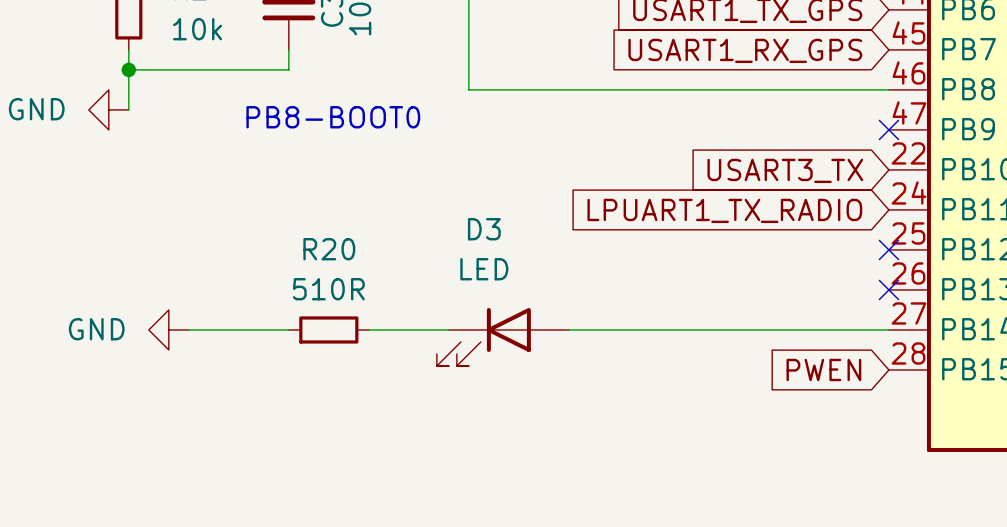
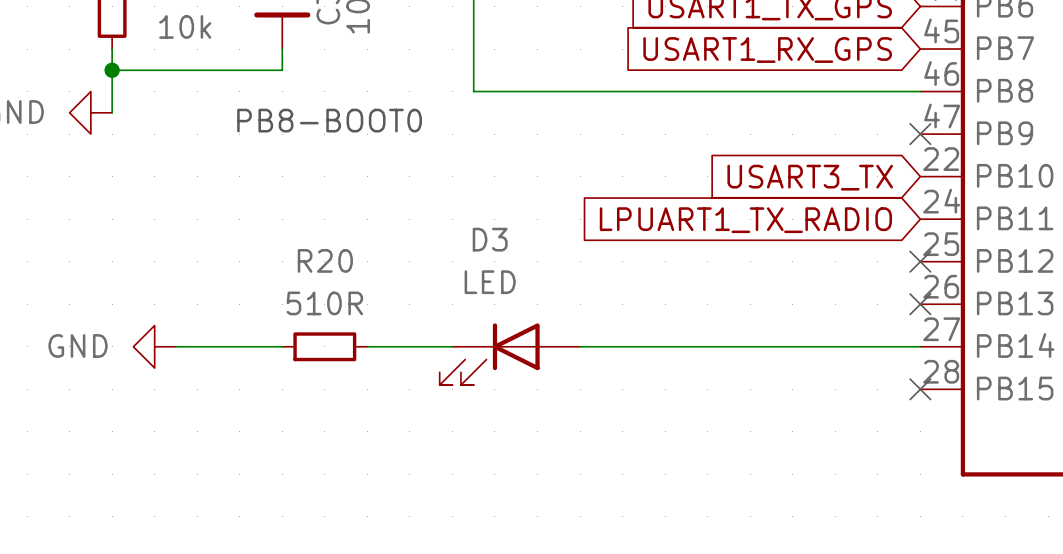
global label: PWEN (823, 369) -> none
no-connect mark: none -> (920, 389)

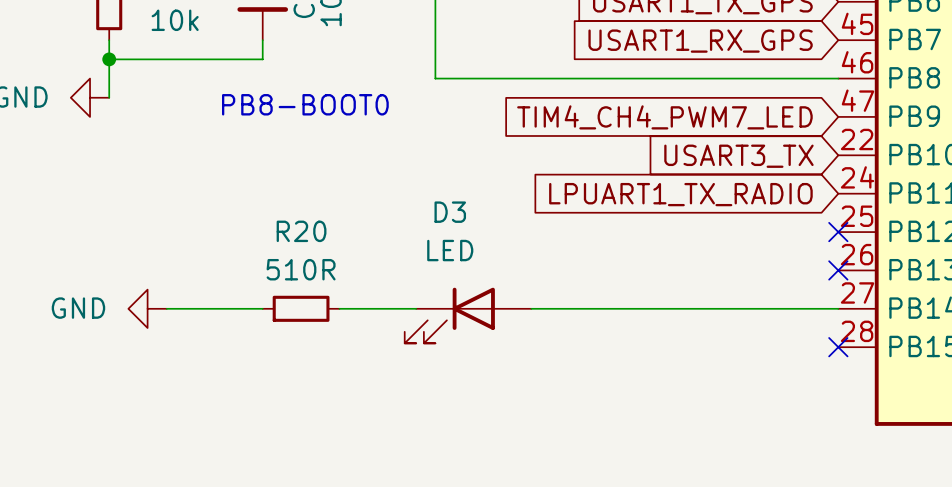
global label: none -> TIM4_CH4_PWM7_LED (664, 117)
no-connect mark: (920, 134) -> none

